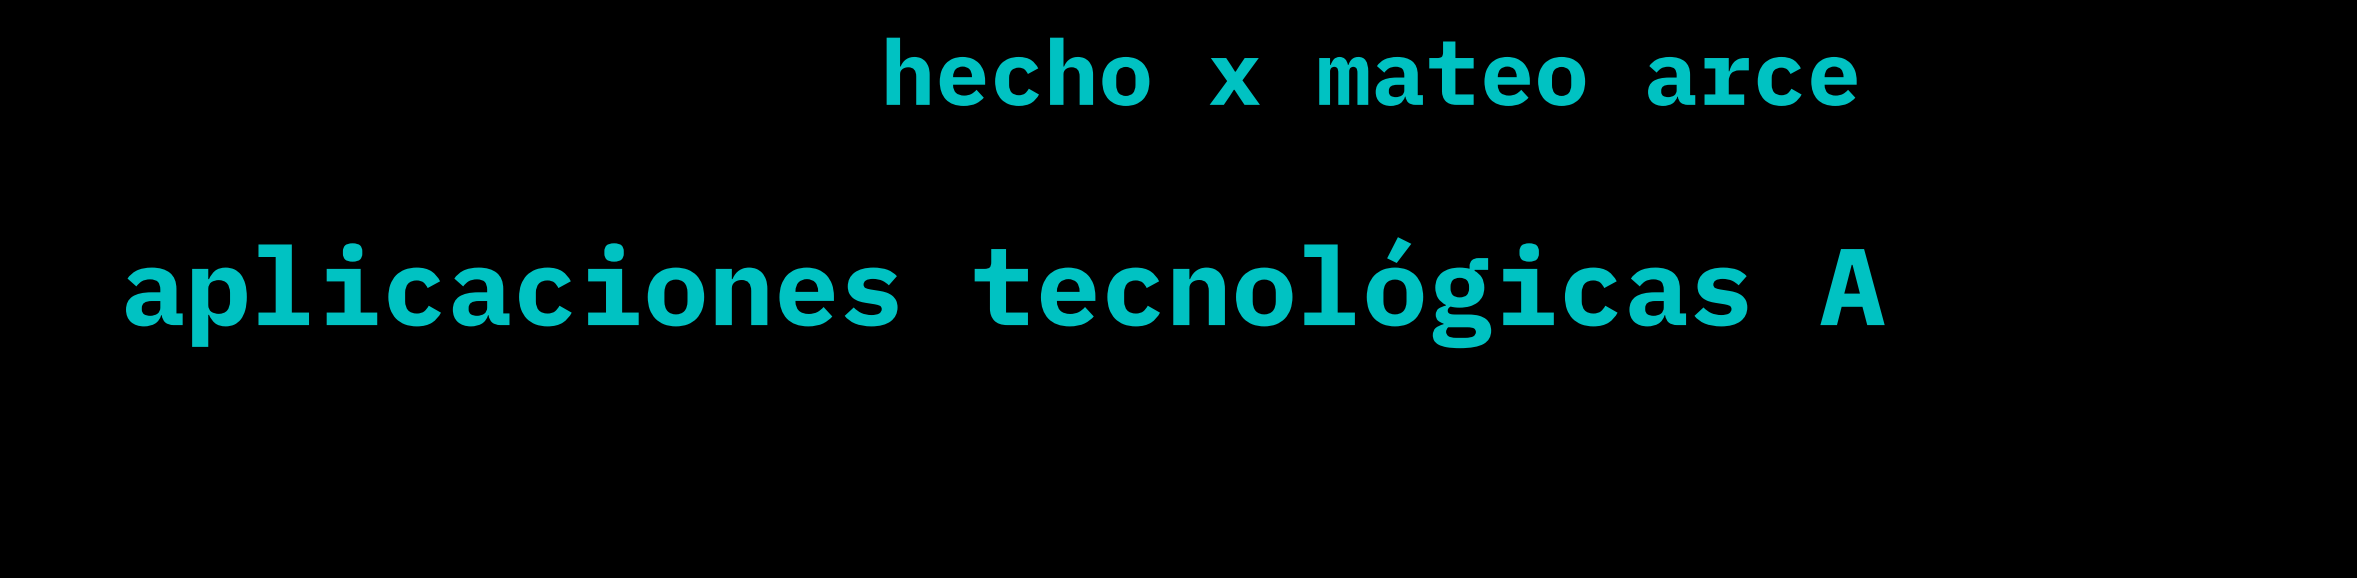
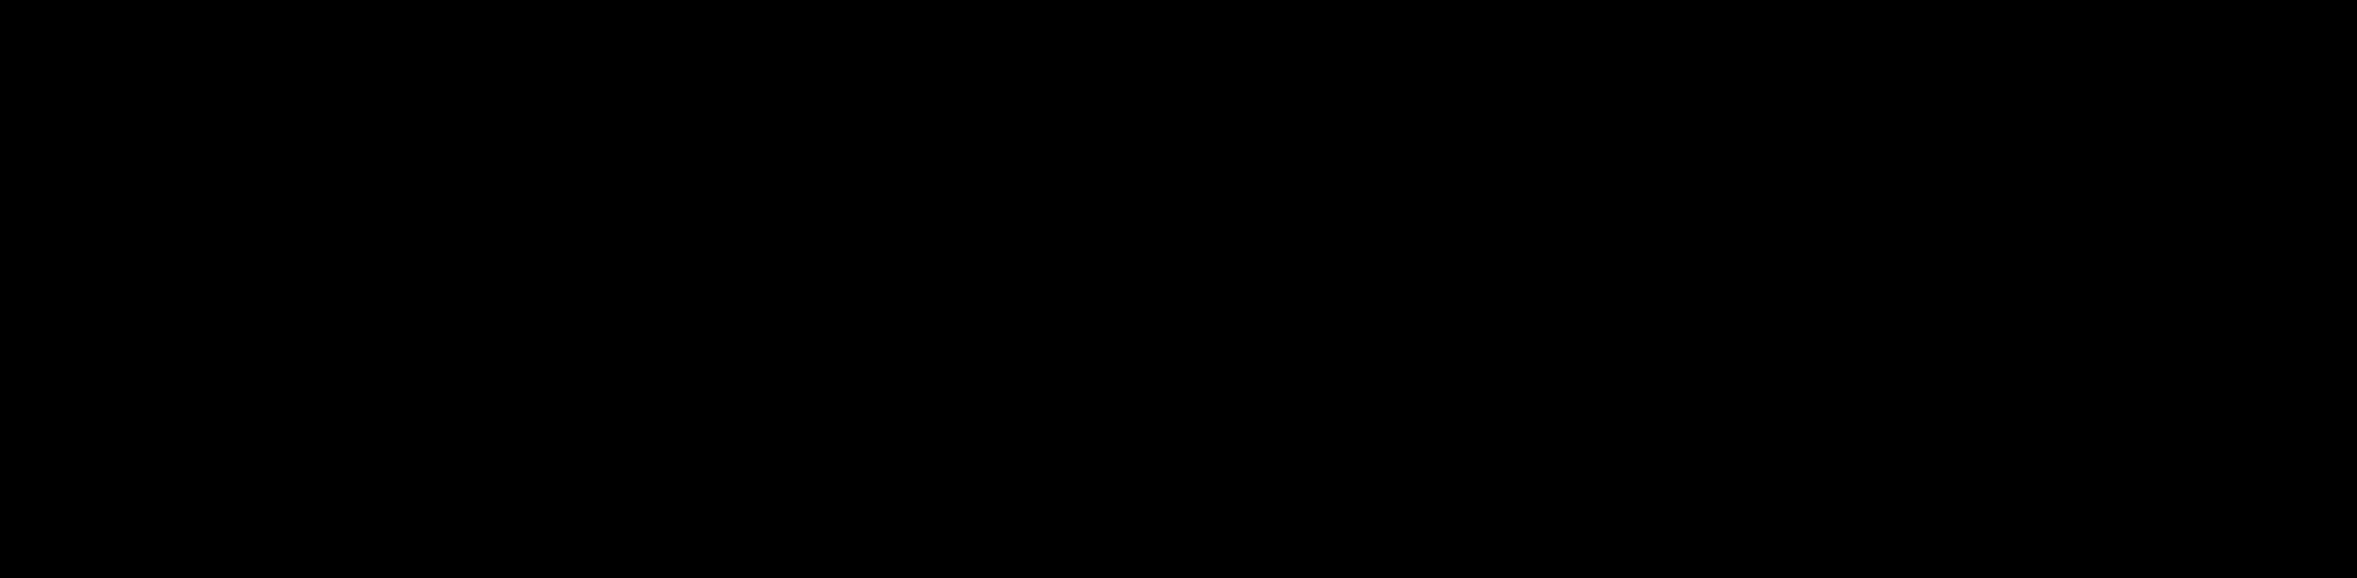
text: hecho x mateo arce (1371, 71) -> none
text: aplicaciones tecnológicas A (1005, 292) -> none

